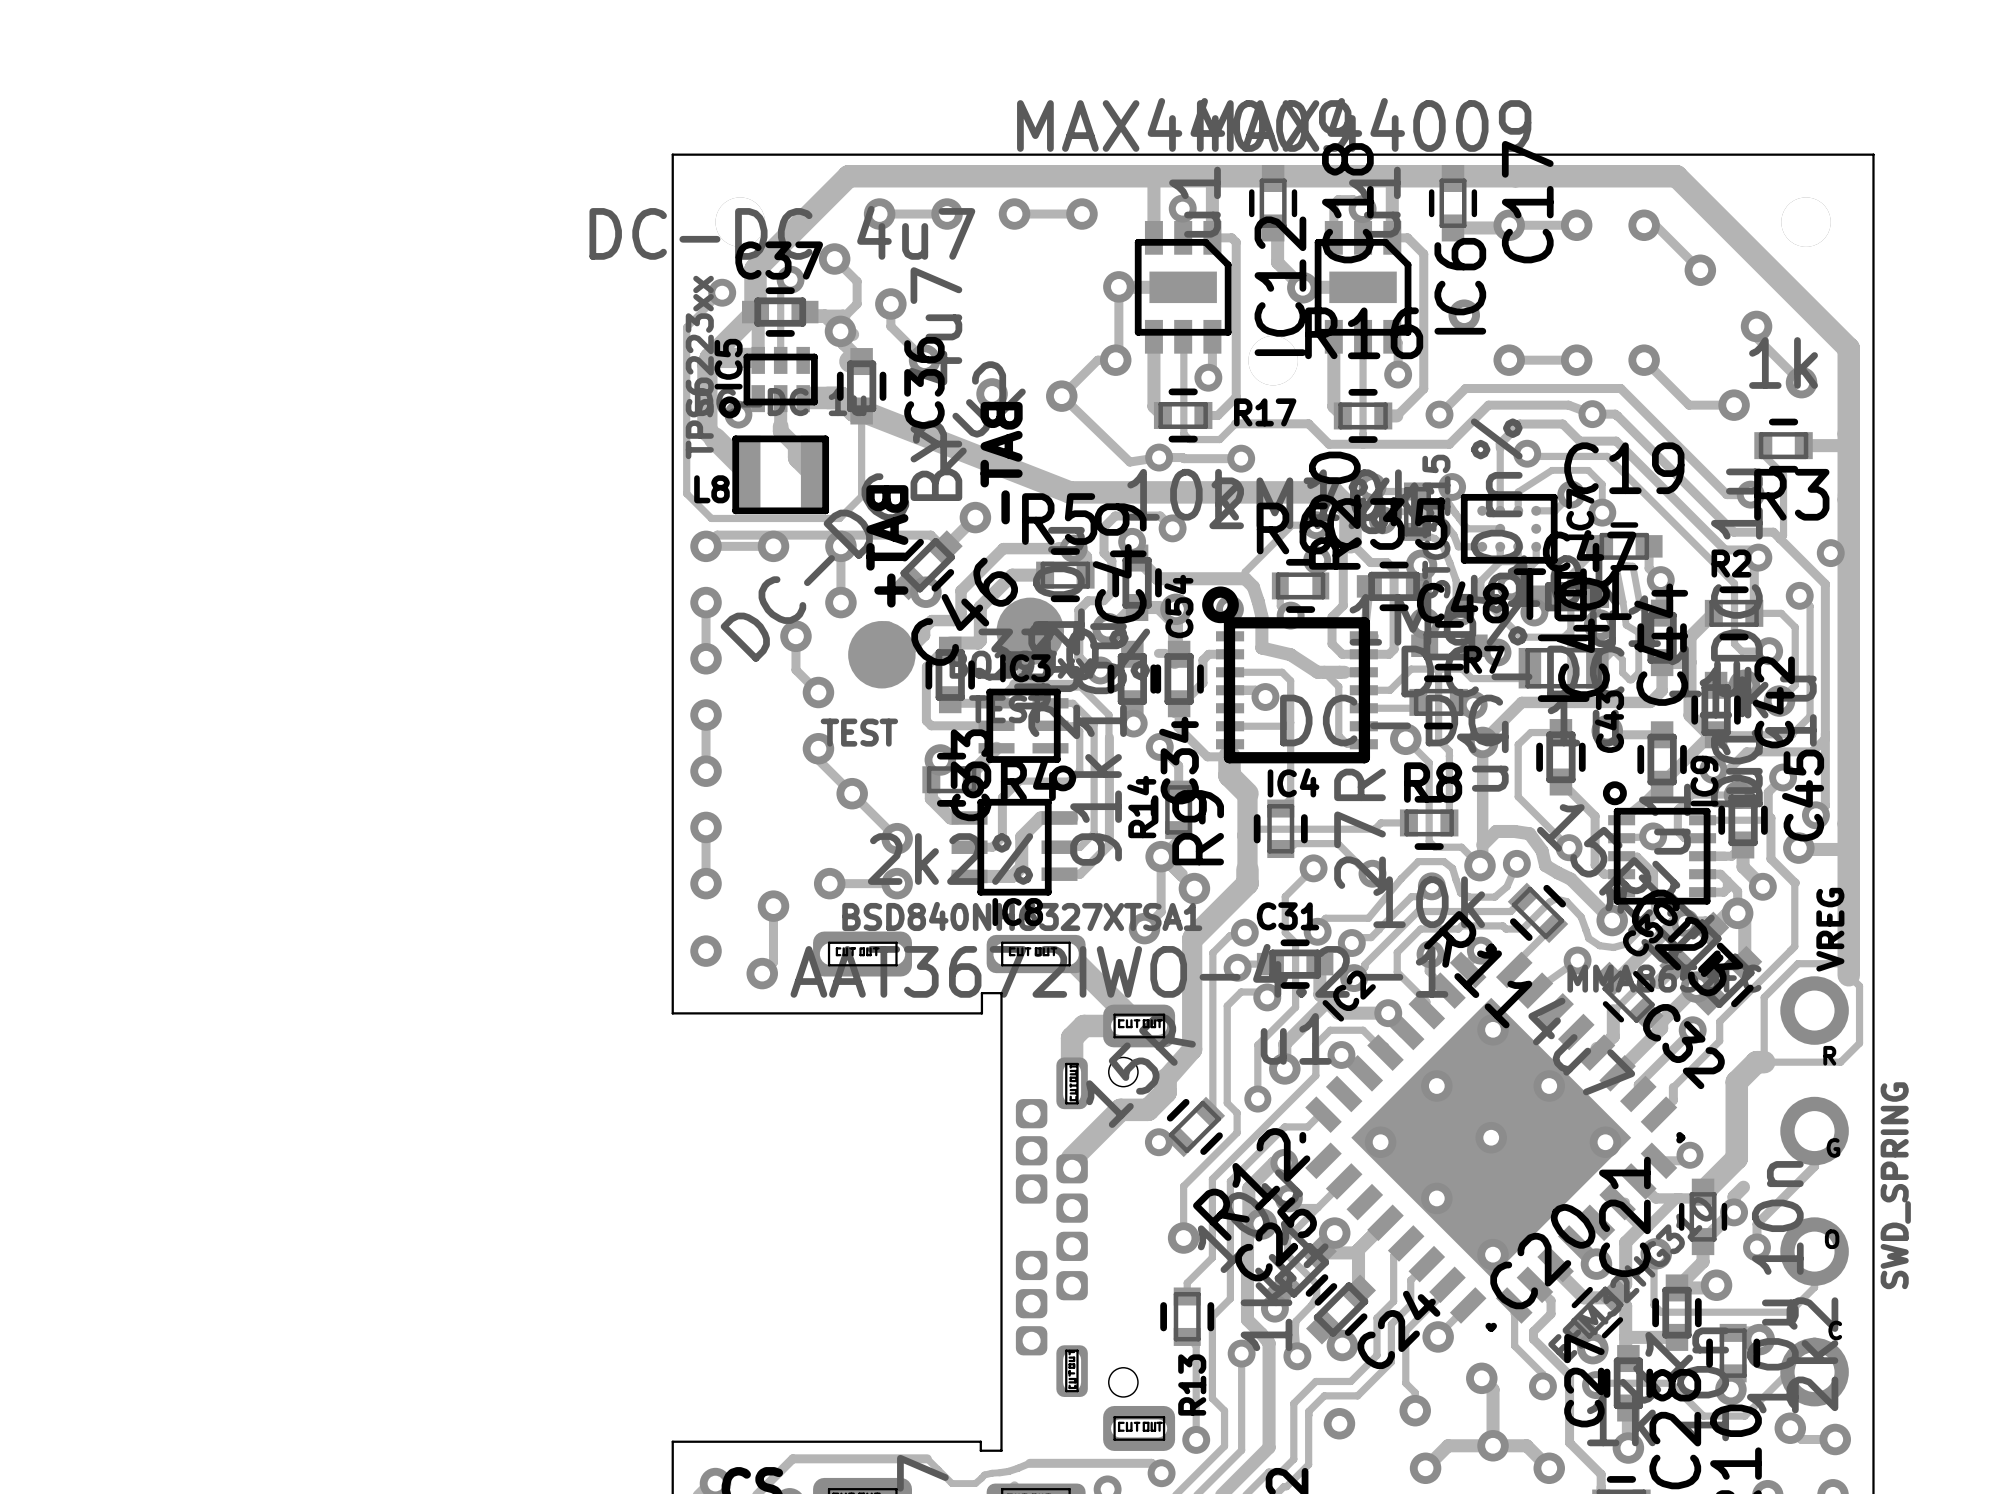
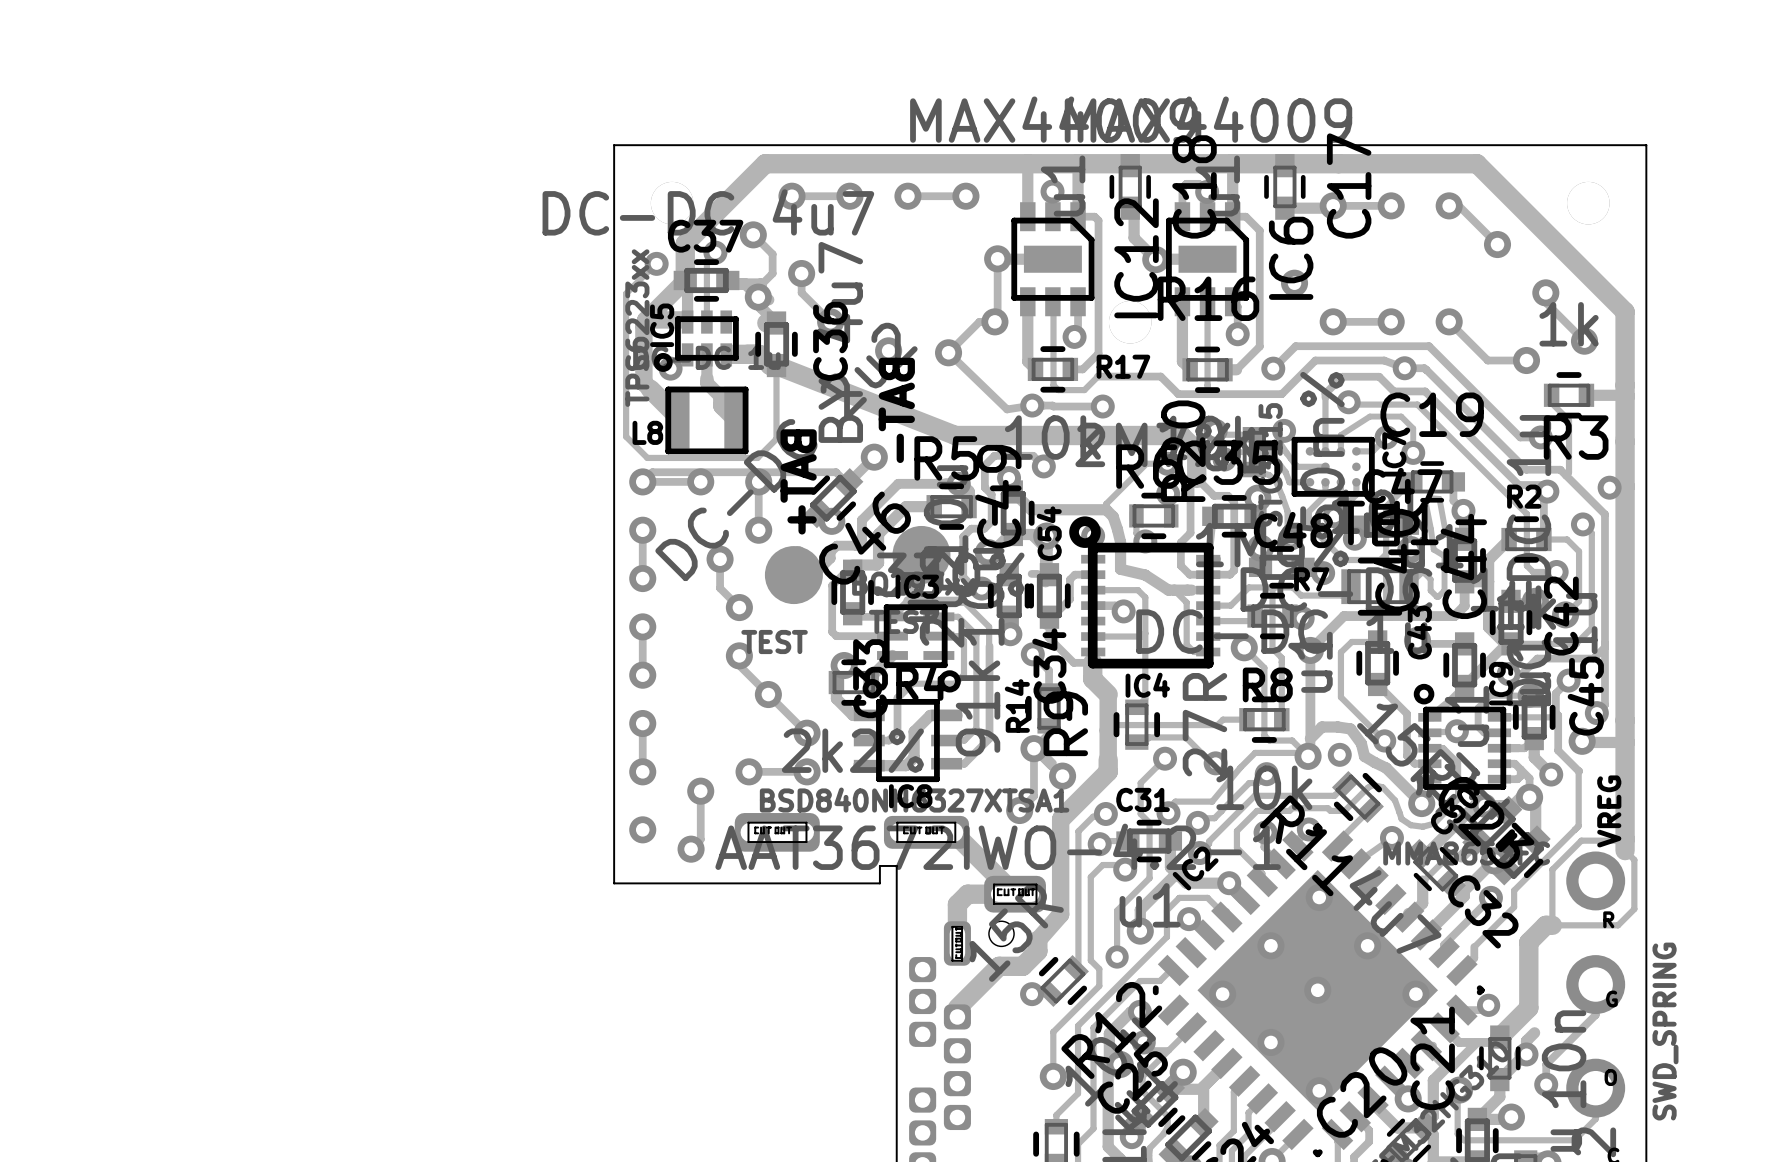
track: (1444, 861) (1452, 868) (1460, 893) (1469, 897) (1494, 897) (1506, 886) (1516, 863) (1516, 870) -> (1277, 752) (1298, 752) (1304, 759)

